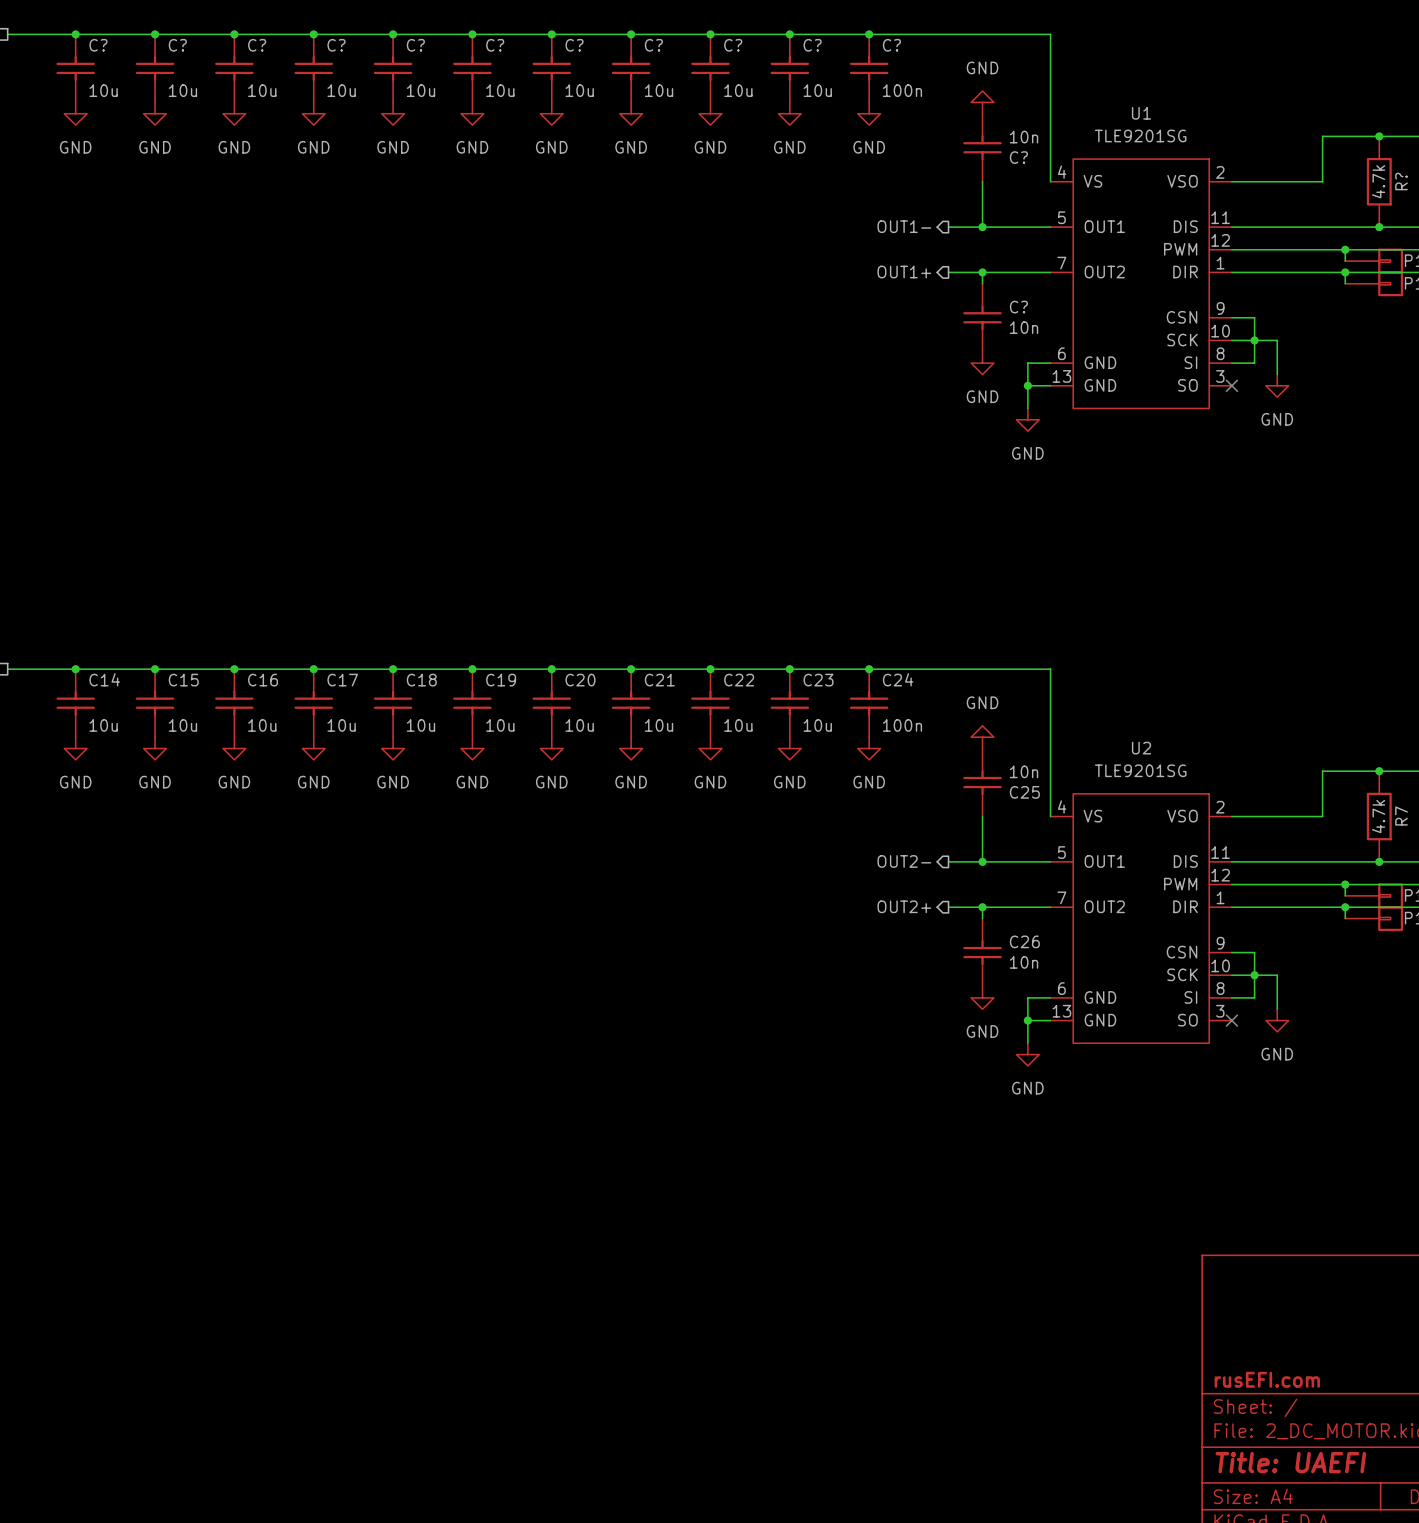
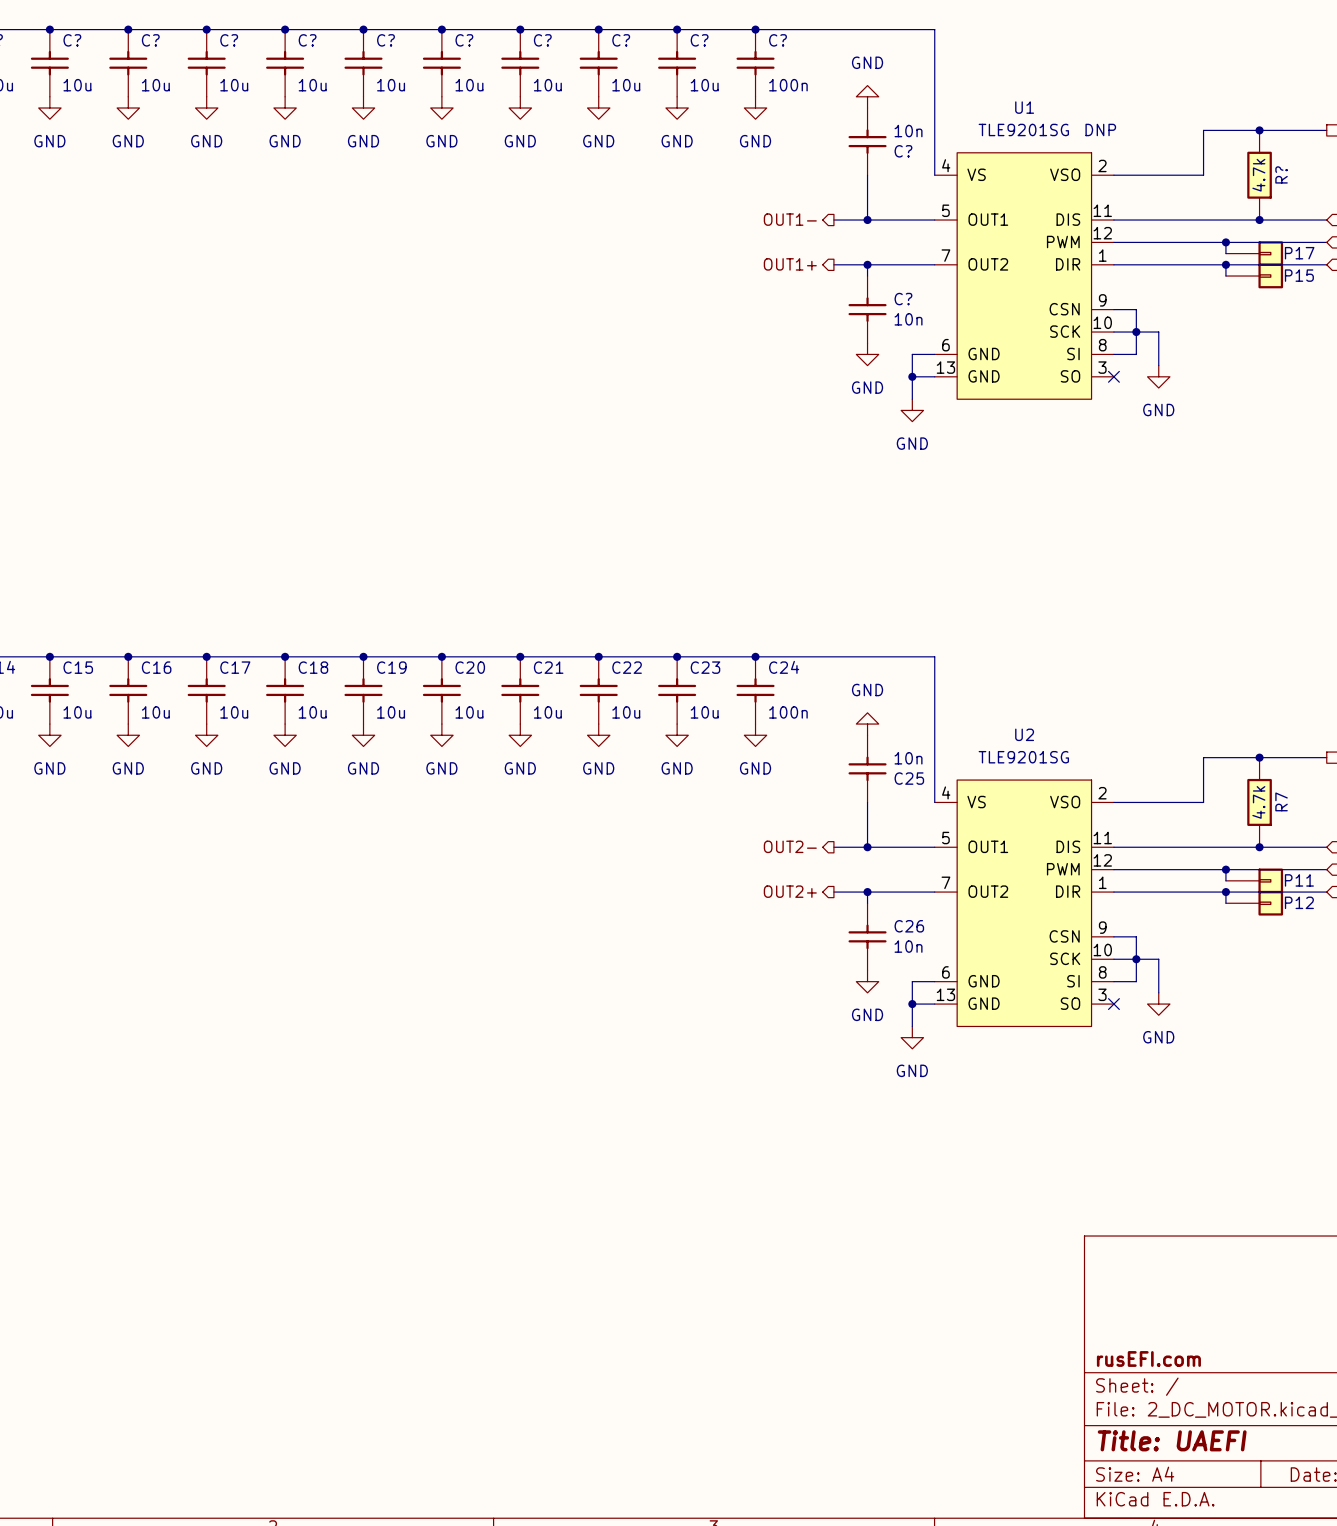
U1 text: none -> DNP (1100, 129)

